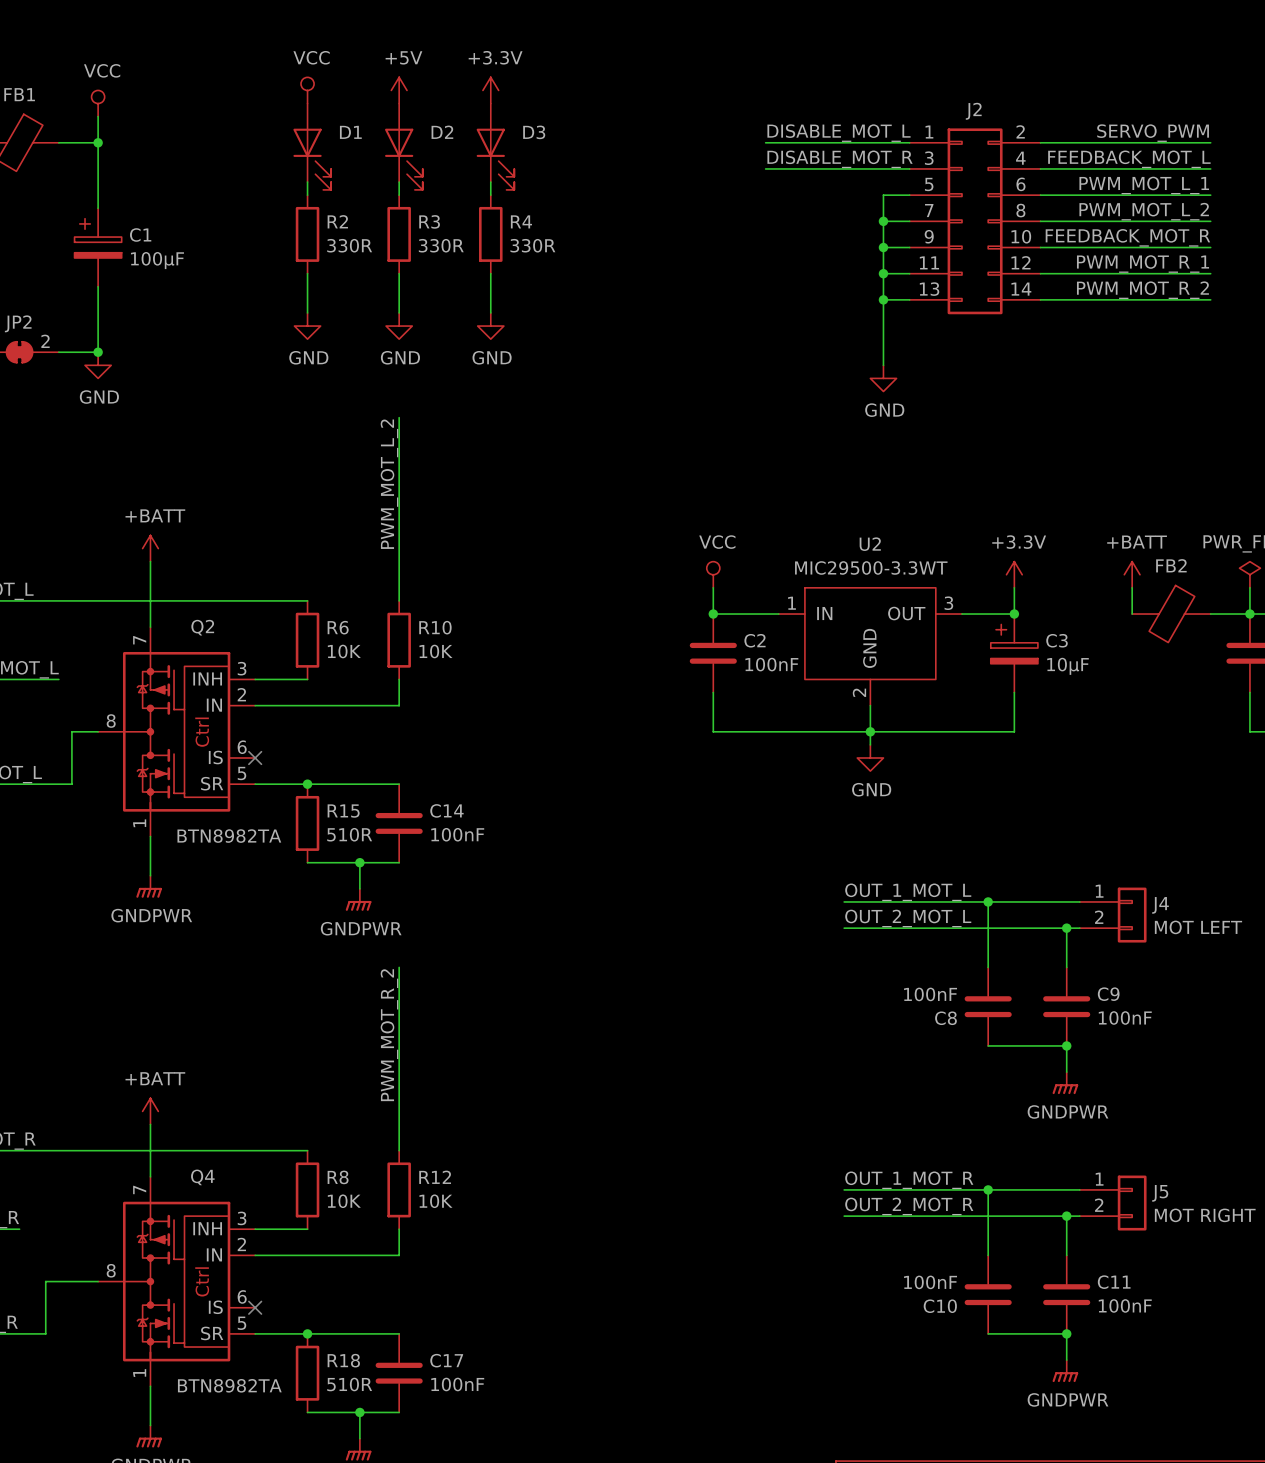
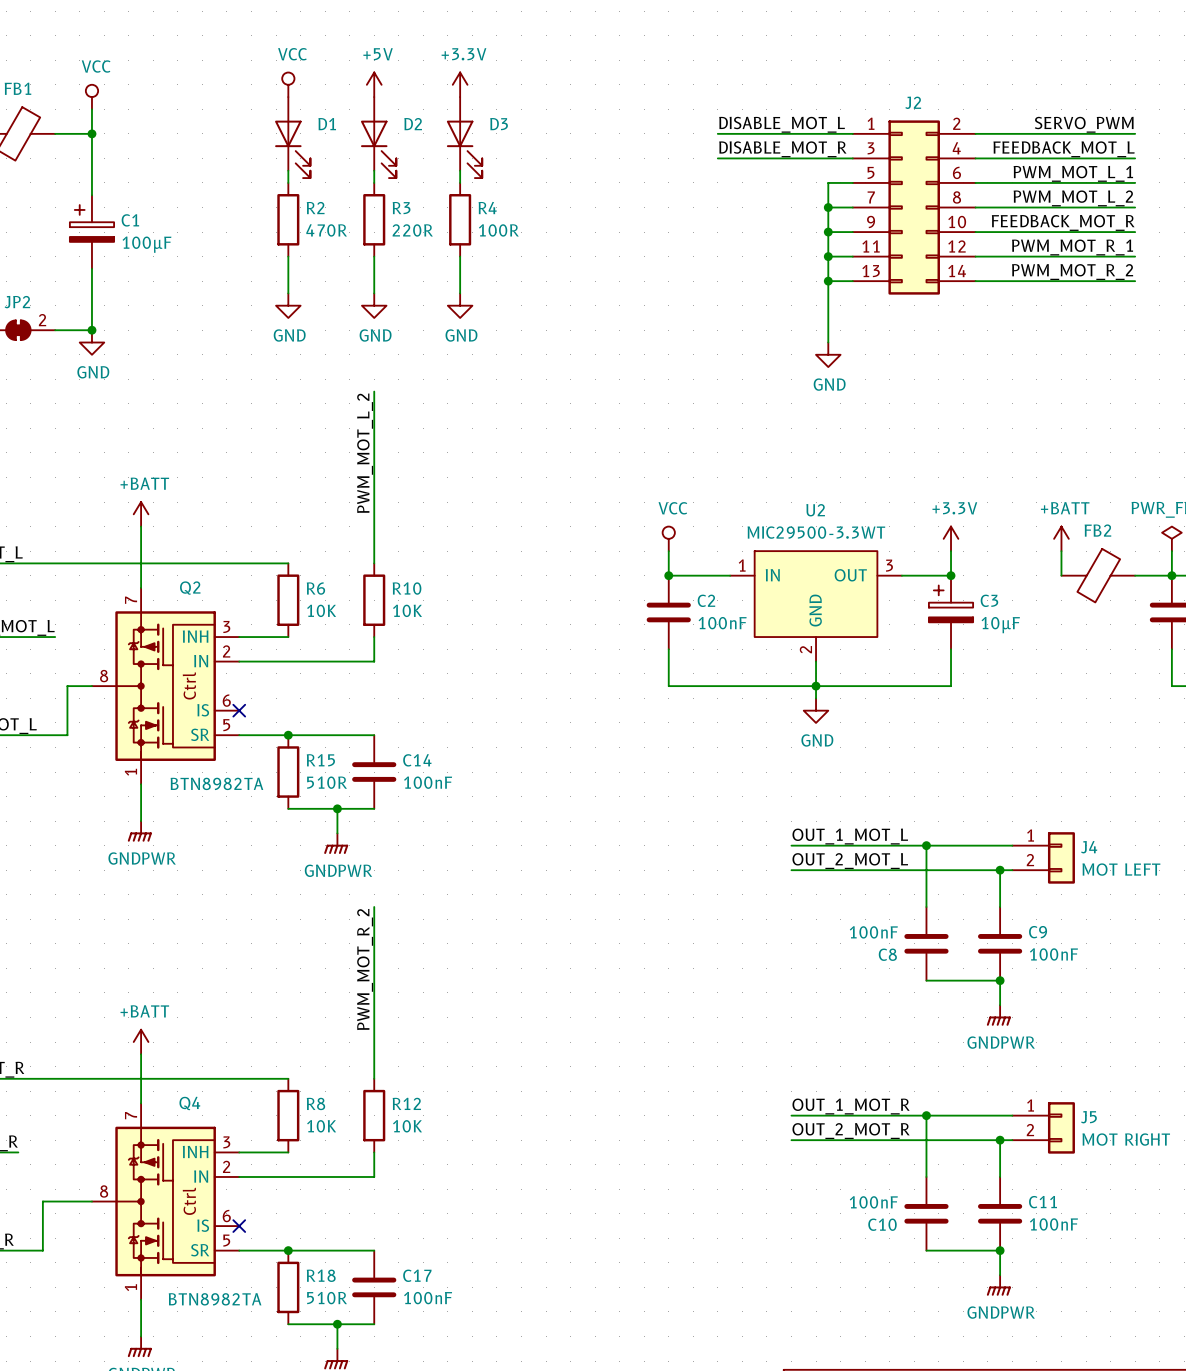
R2 value: 330R (349, 245) -> 470R (326, 230)
R3 value: 330R (441, 245) -> 220R (412, 230)
R4 value: 330R (532, 245) -> 100R (498, 230)

